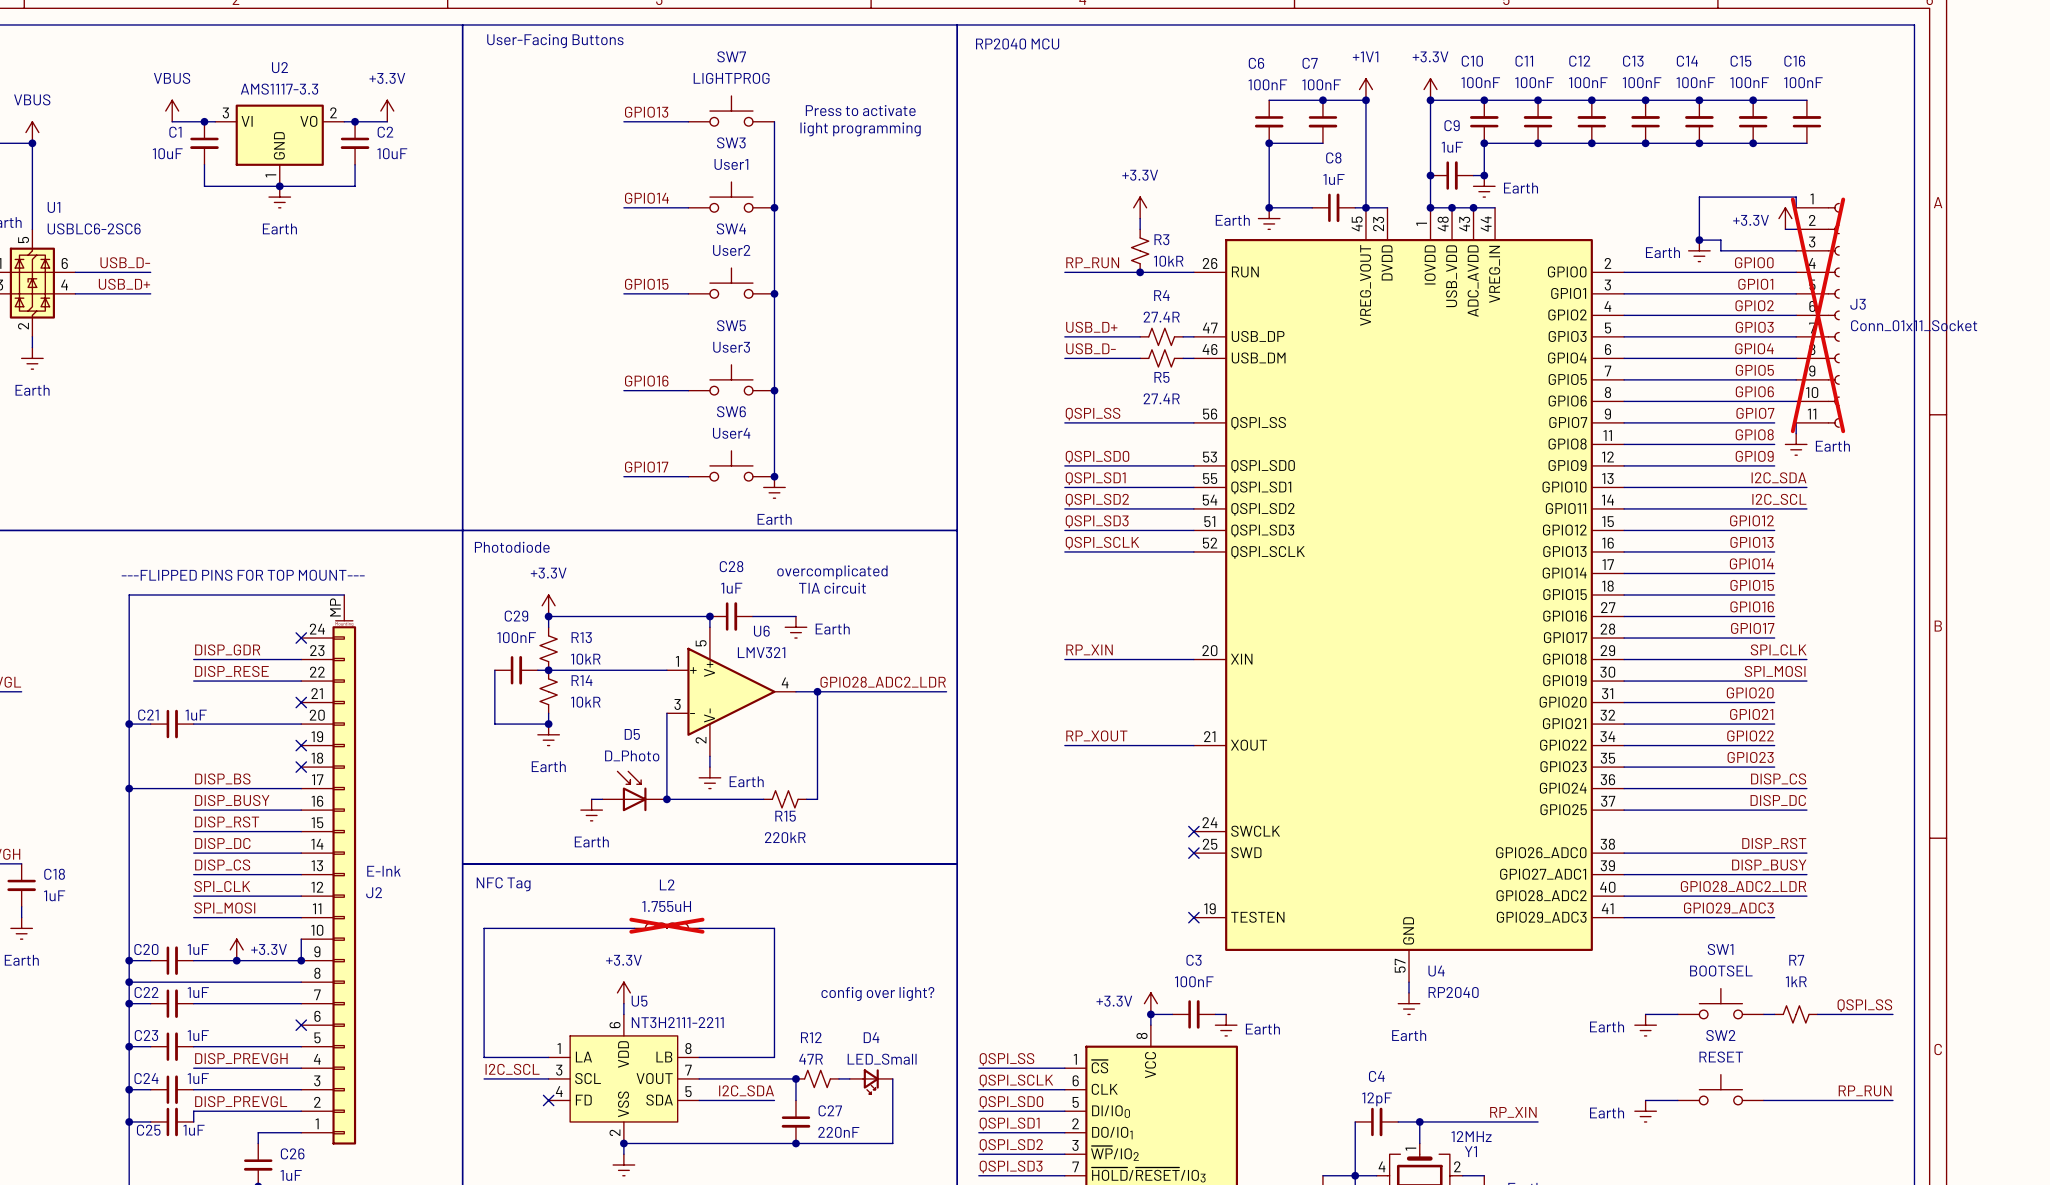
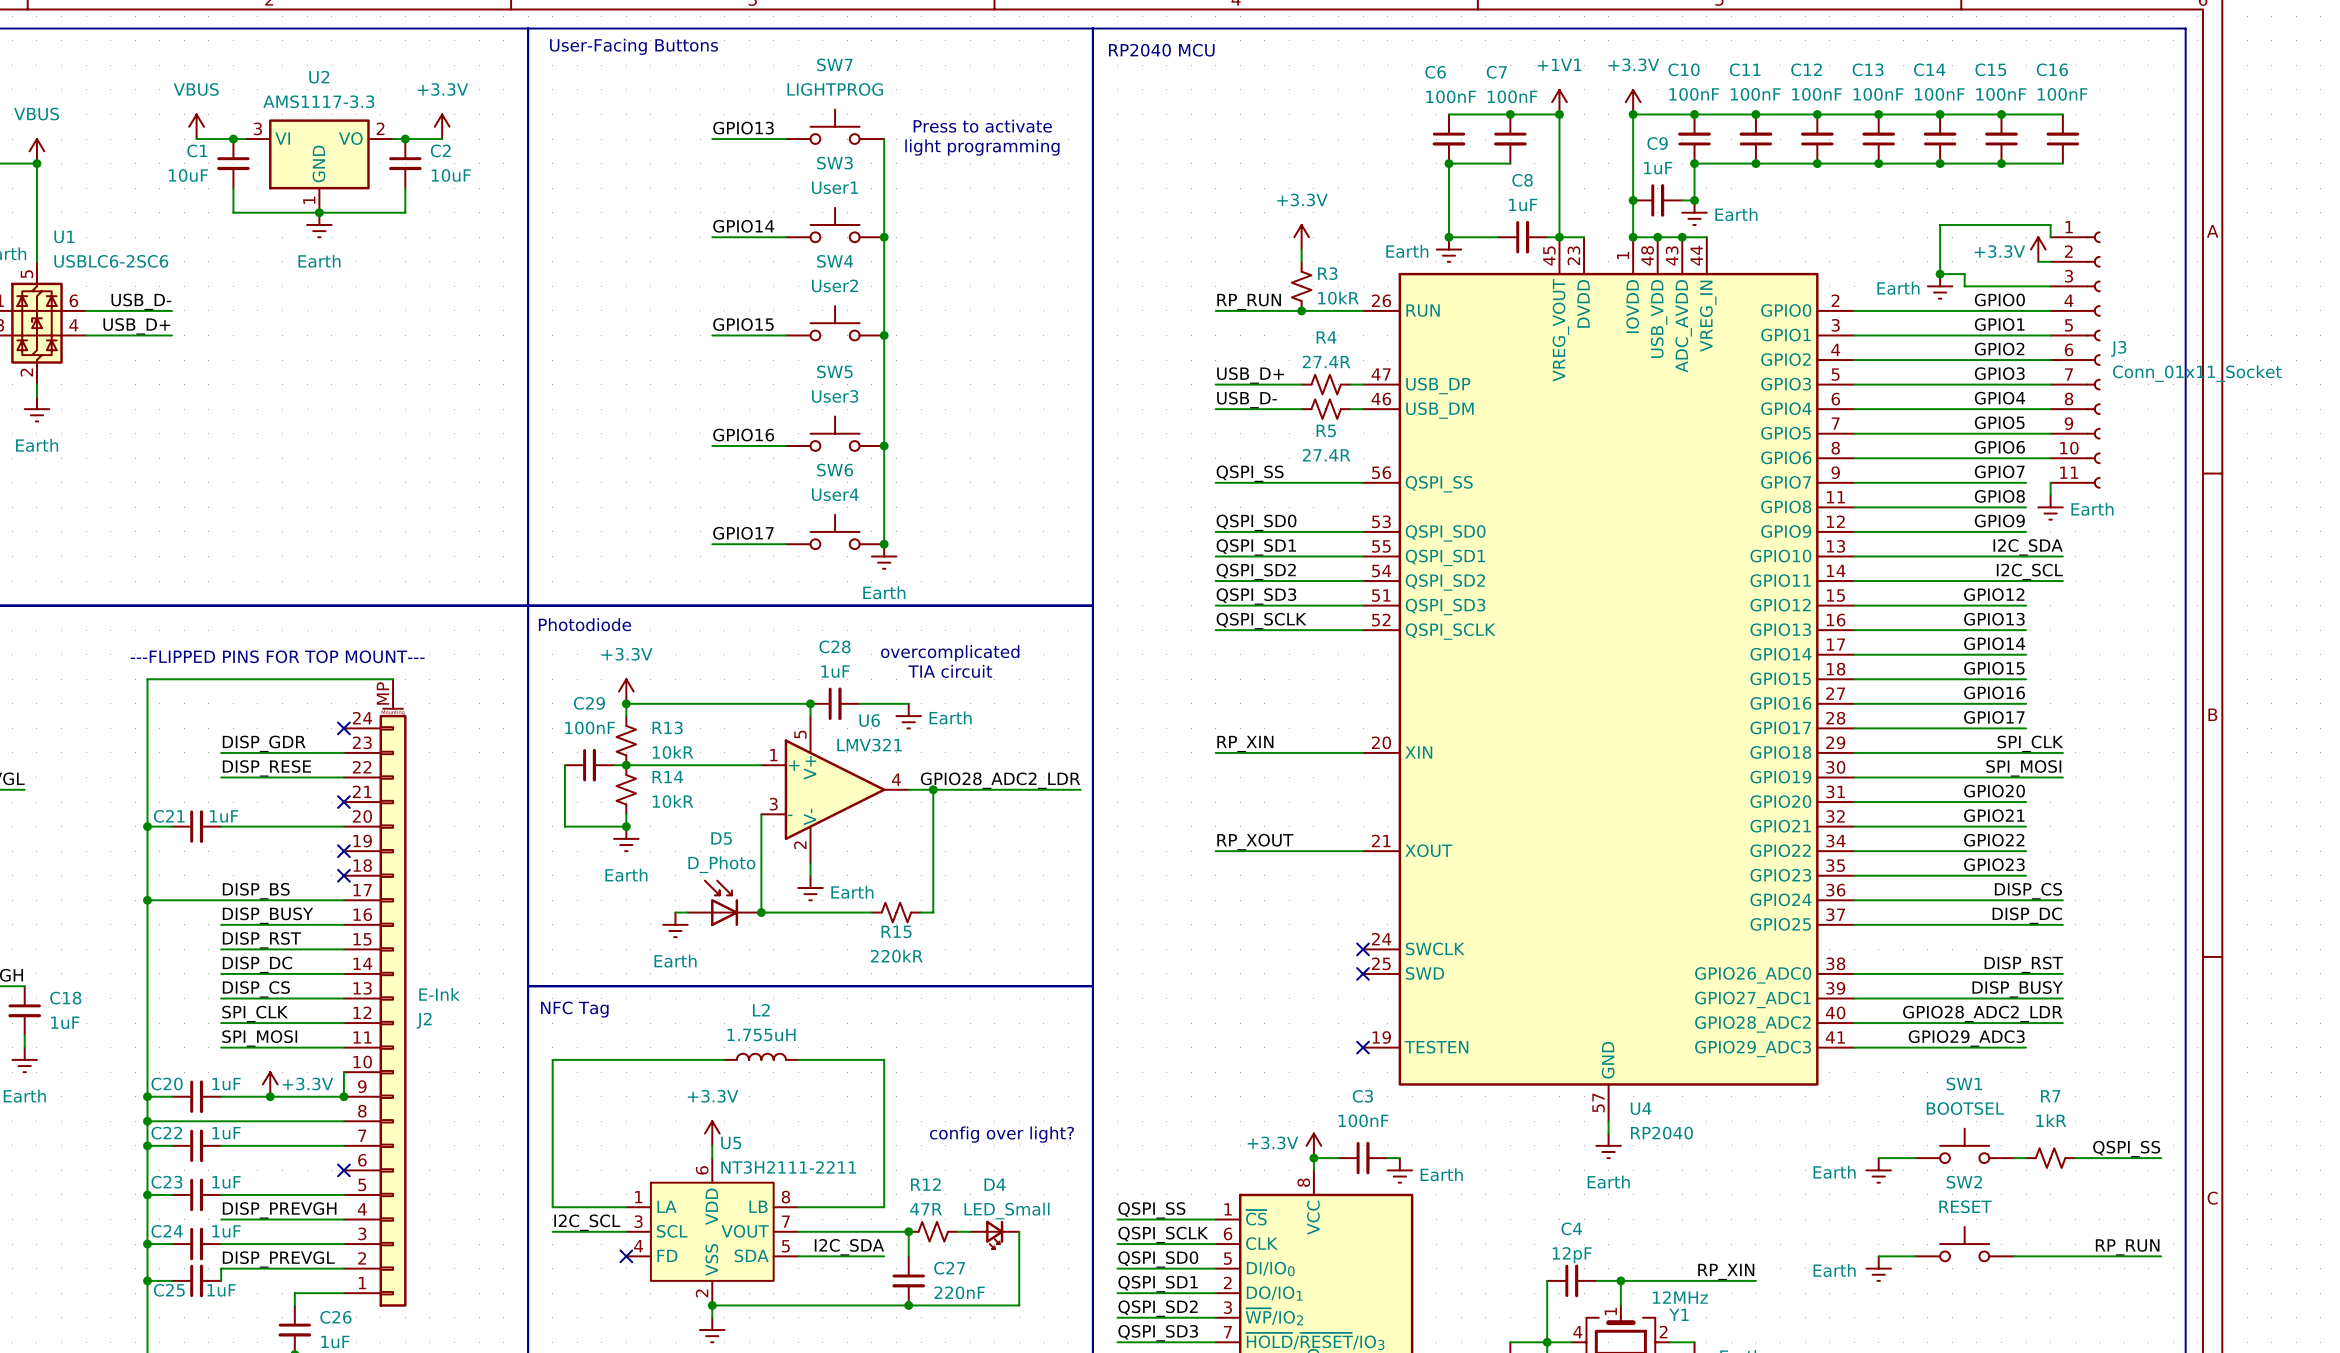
J3 do-not-place cross: (1818, 315) -> none
L2 do-not-place cross: (666, 925) -> none

